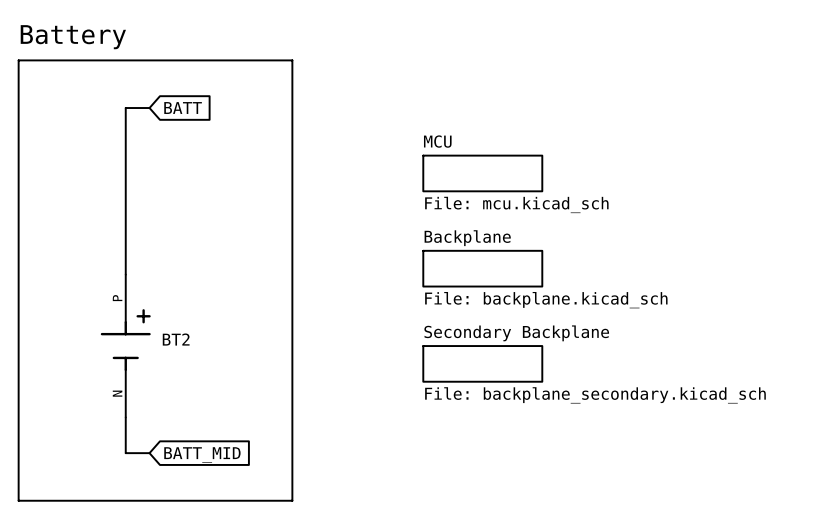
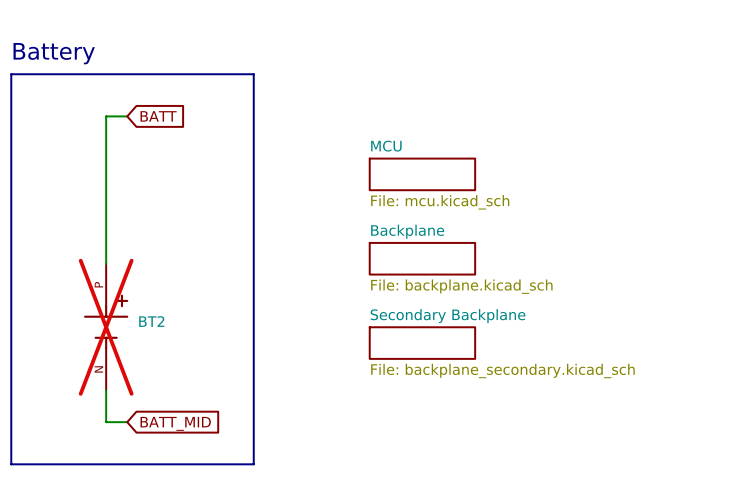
BT2 do-not-place cross: none -> (106, 327)

